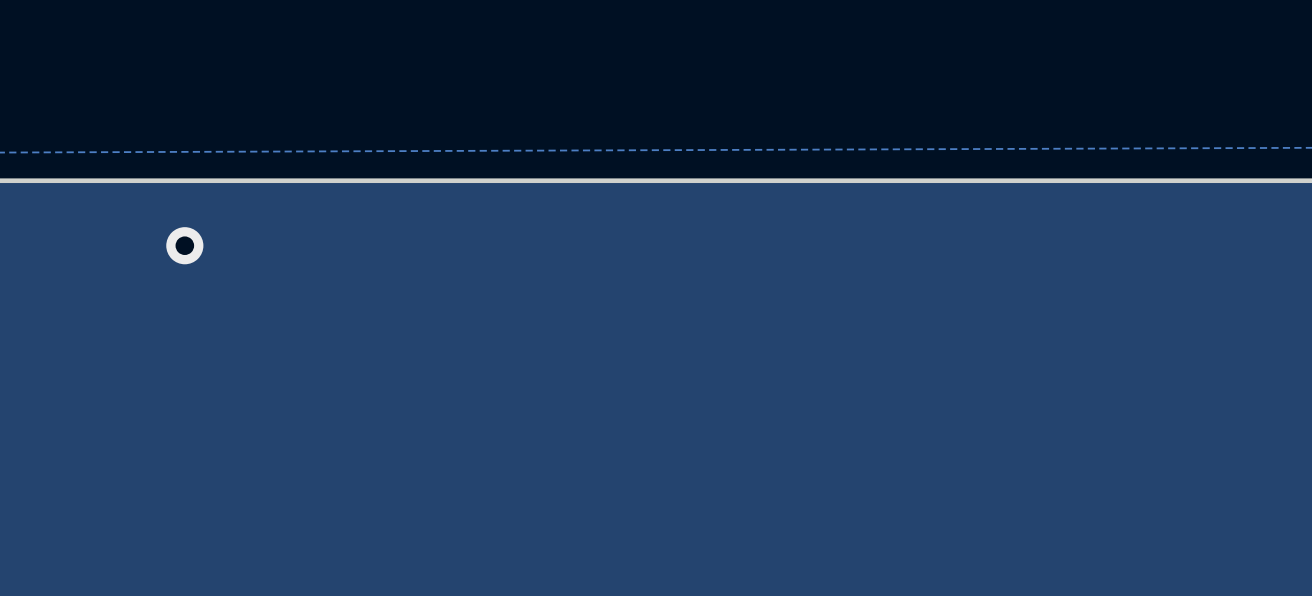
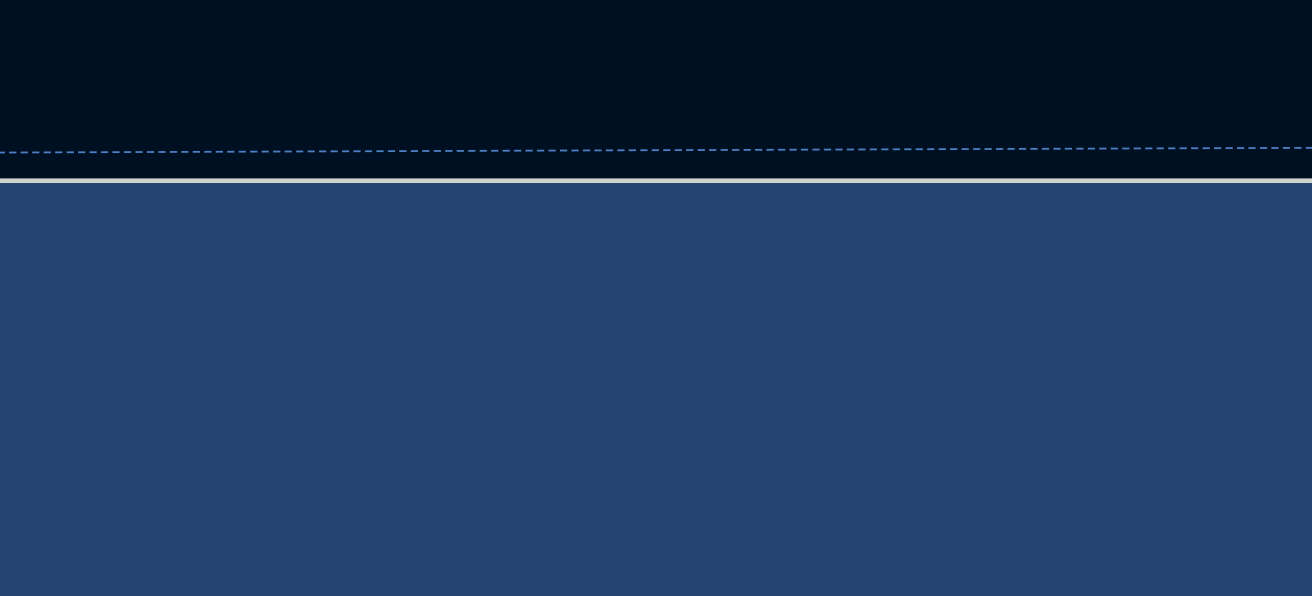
via: (184, 245) -> none

